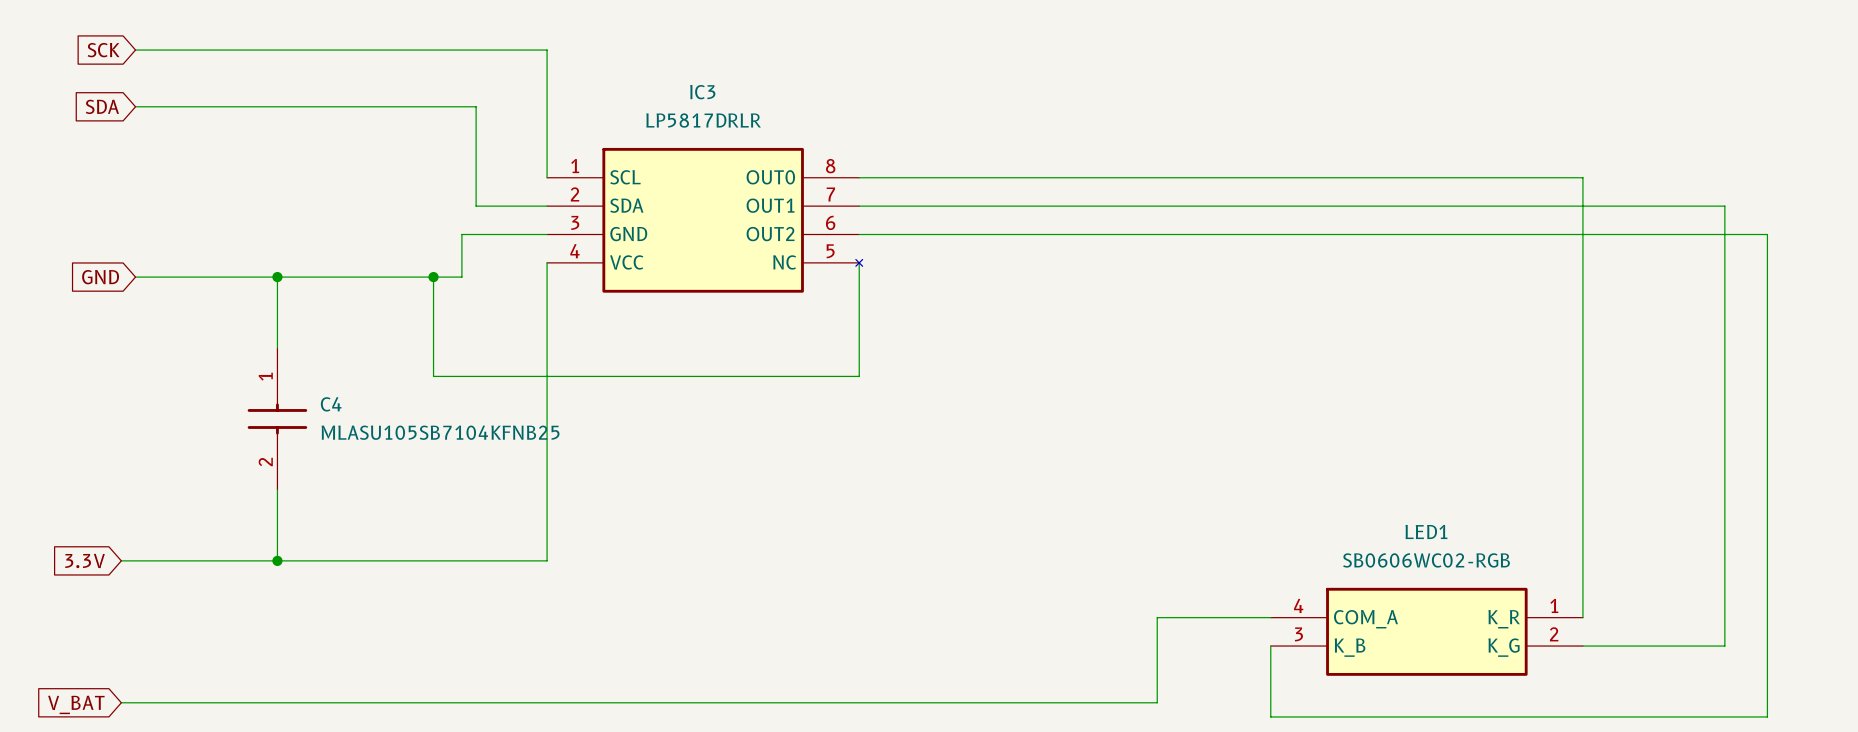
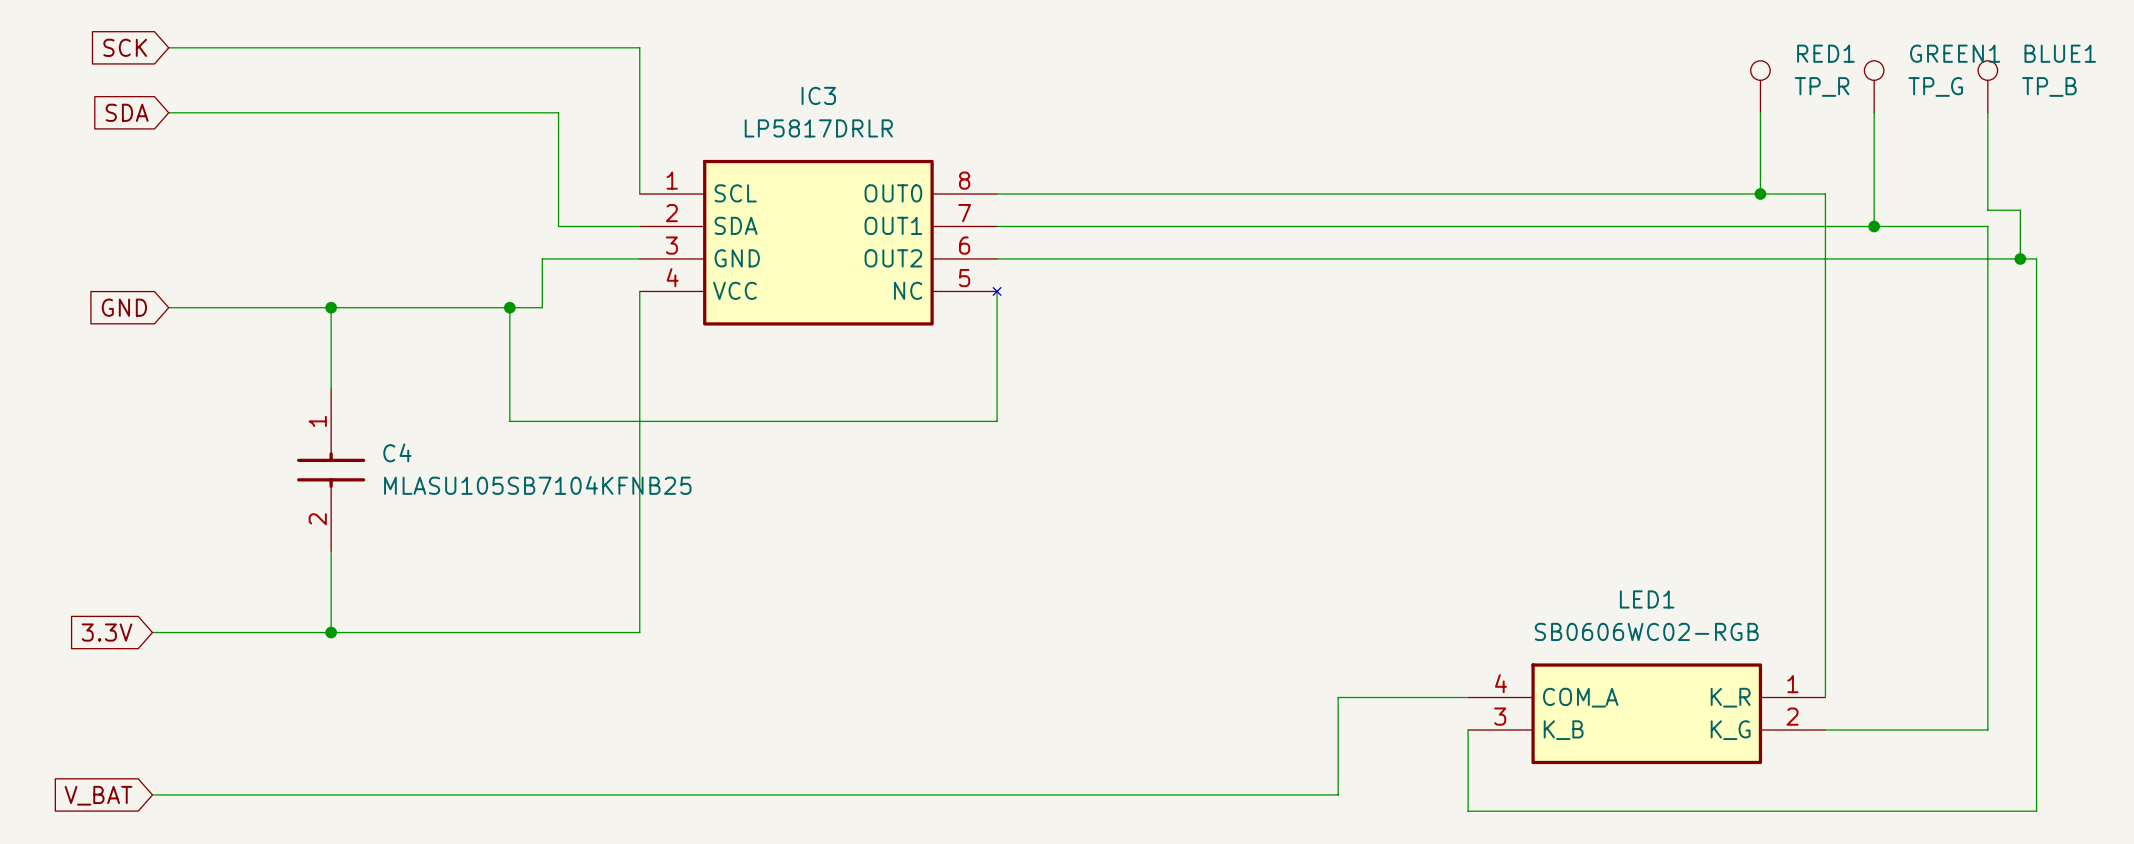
RED1: none -> TP_R (1760, 86)
GREEN1: none -> TP_G (1874, 86)
BLUE1: none -> TP_B (1987, 86)
wire: none -> (1760, 112) (1760, 194)
wire: none -> (1874, 112) (1874, 226)
wire: none -> (1987, 112) (1987, 210) (2020, 210) (2020, 258)
junction: none -> (1760, 194)
junction: none -> (1874, 226)
junction: none -> (2020, 258)

